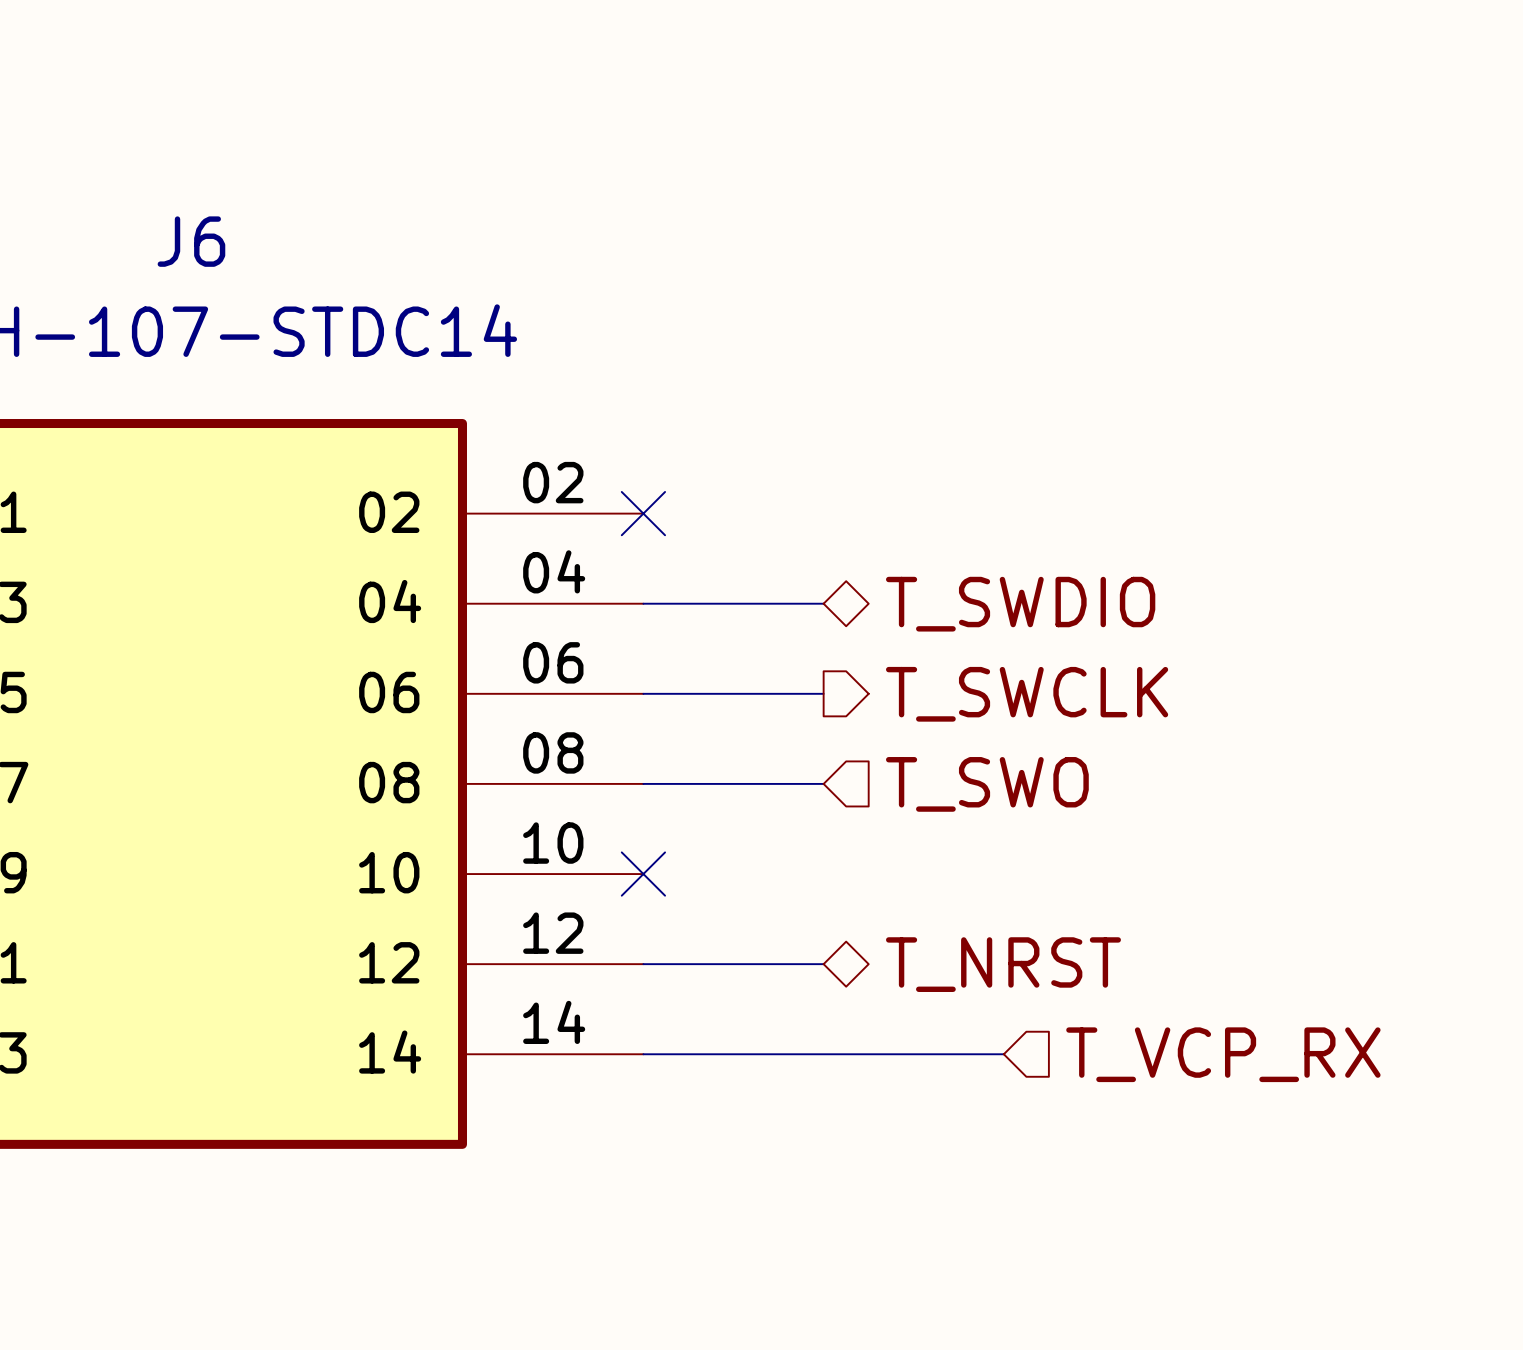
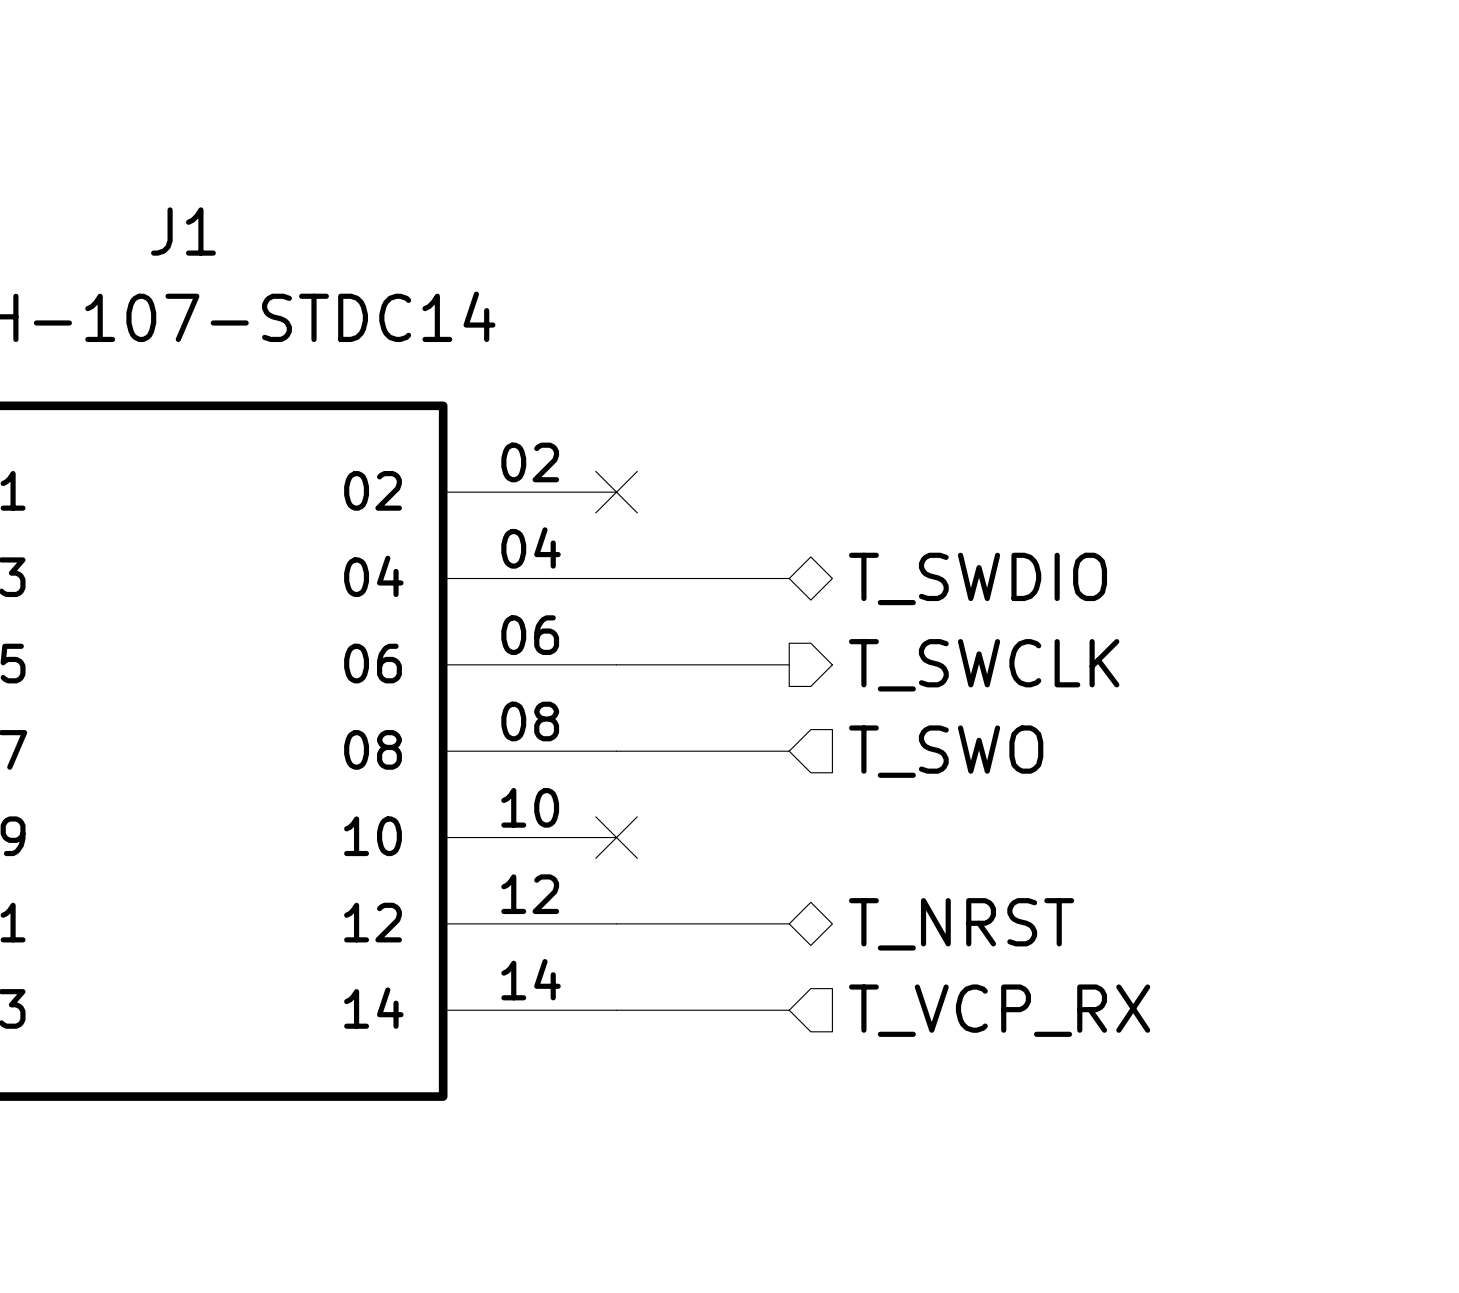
J6 name: J6 (191, 241) -> J1 (183, 231)
wire: (823, 1054) (1003, 1054) -> none
hierarchical label position: T_VCP_RX (1223, 1054) -> T_VCP_RX (999, 1010)

